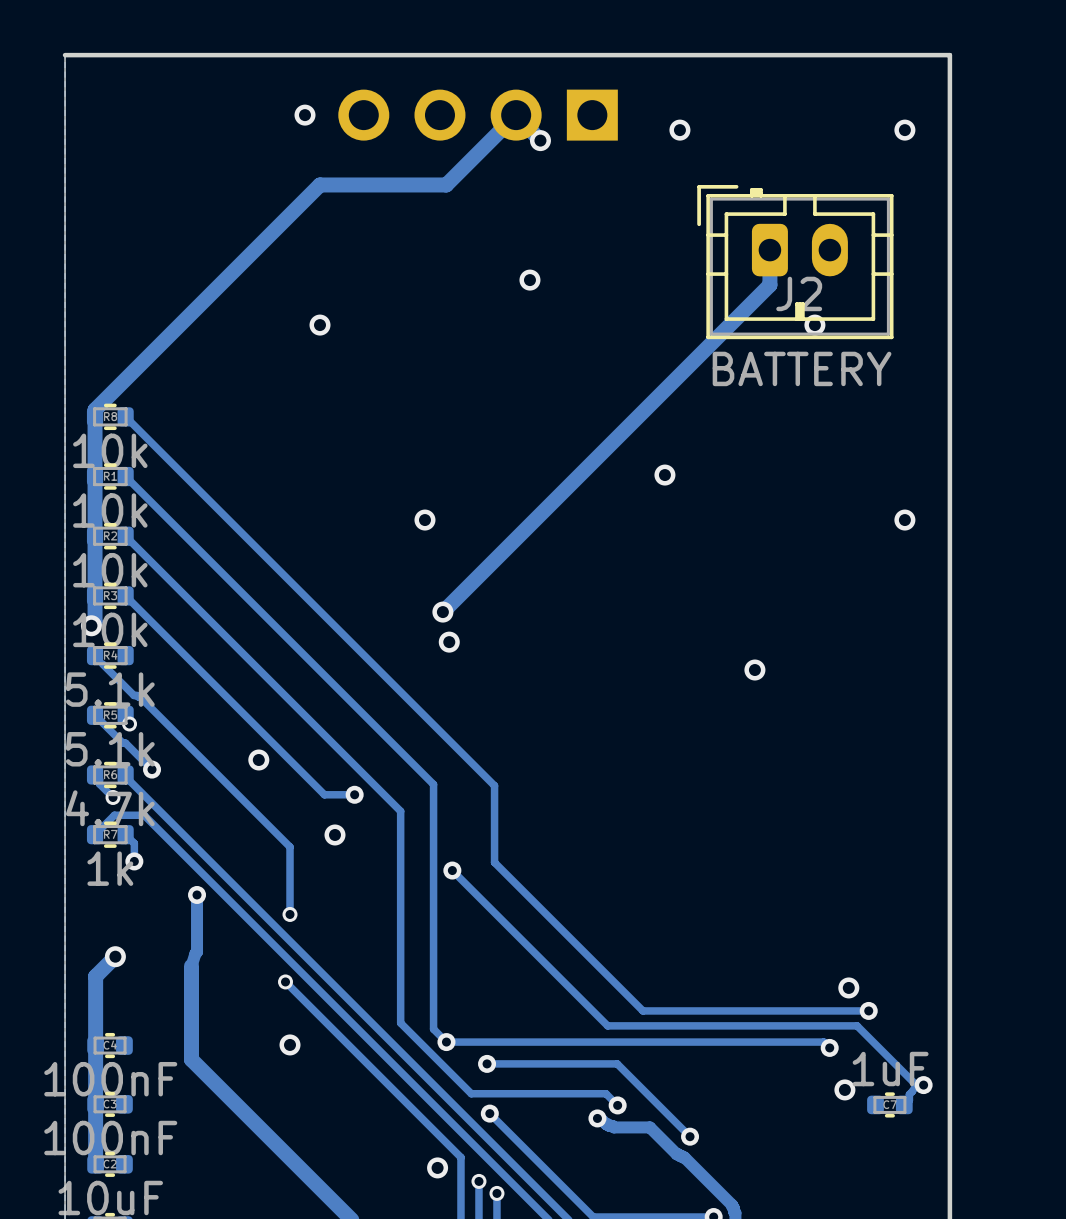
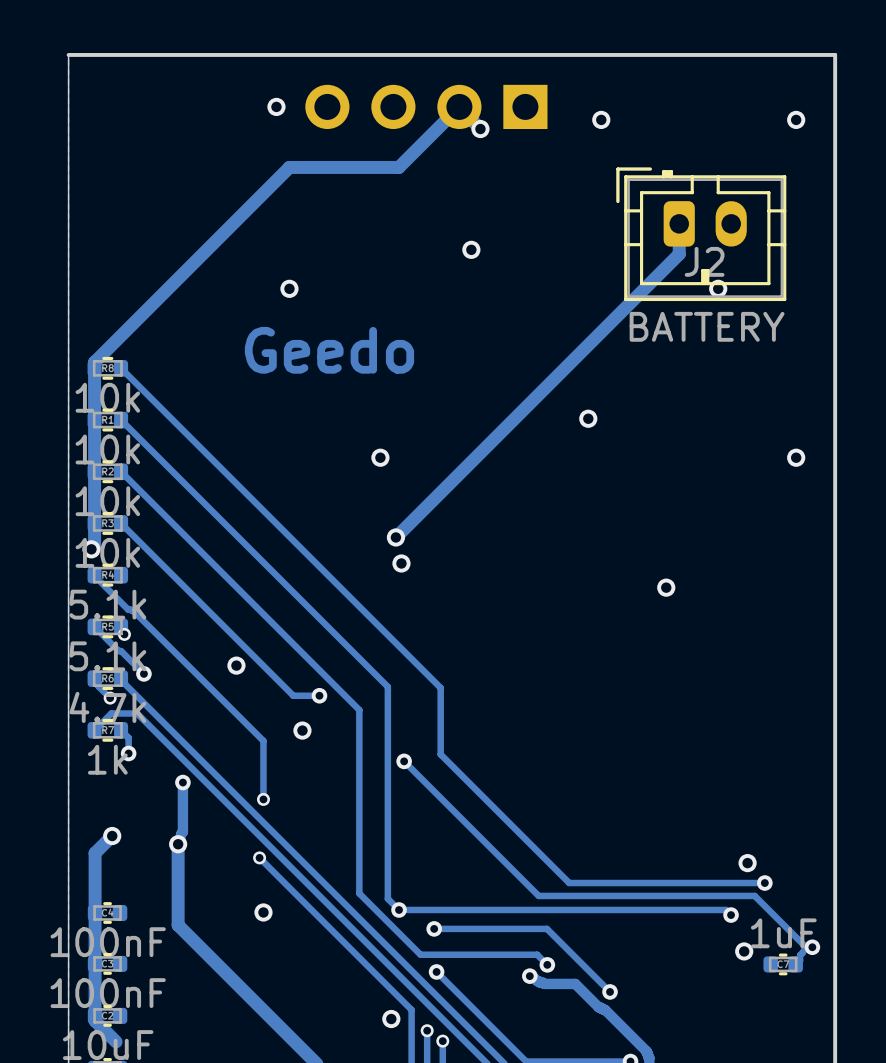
text: none -> Geedo (329, 350)
via: none -> (178, 844)
track: none -> (95, 1015) (95, 1020) (116, 1041)

